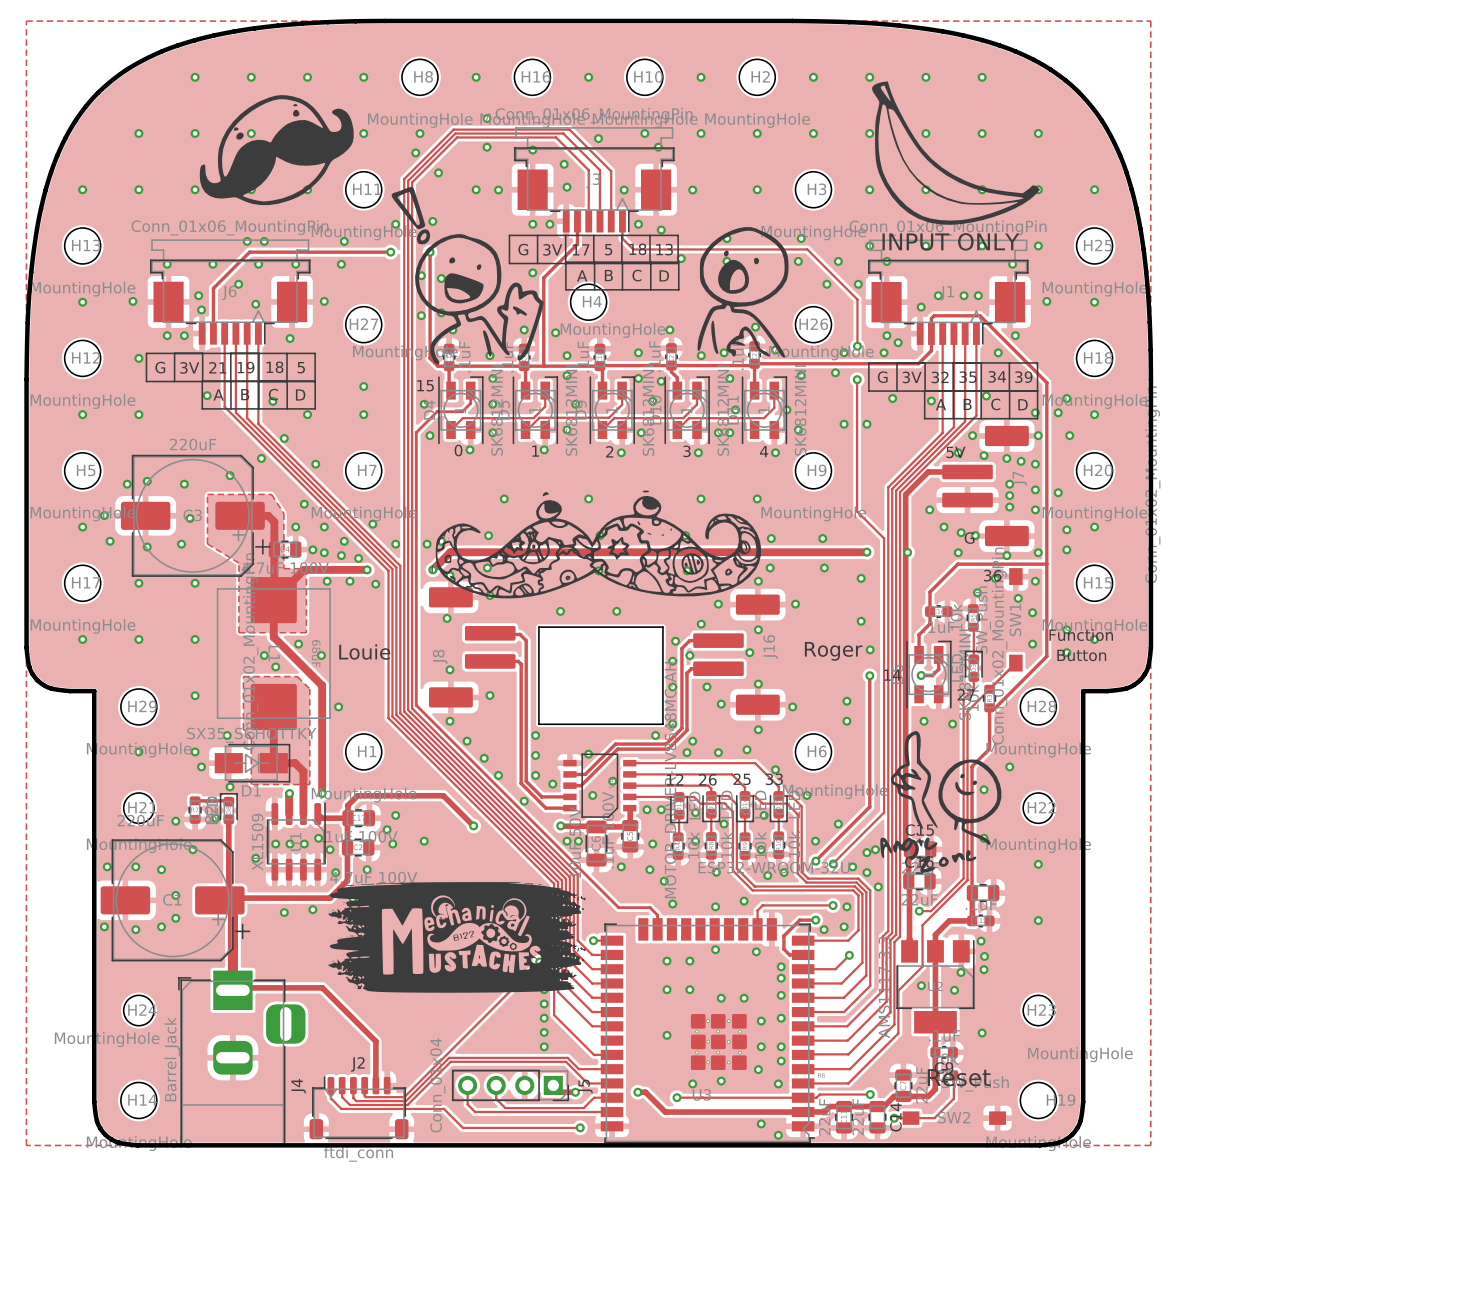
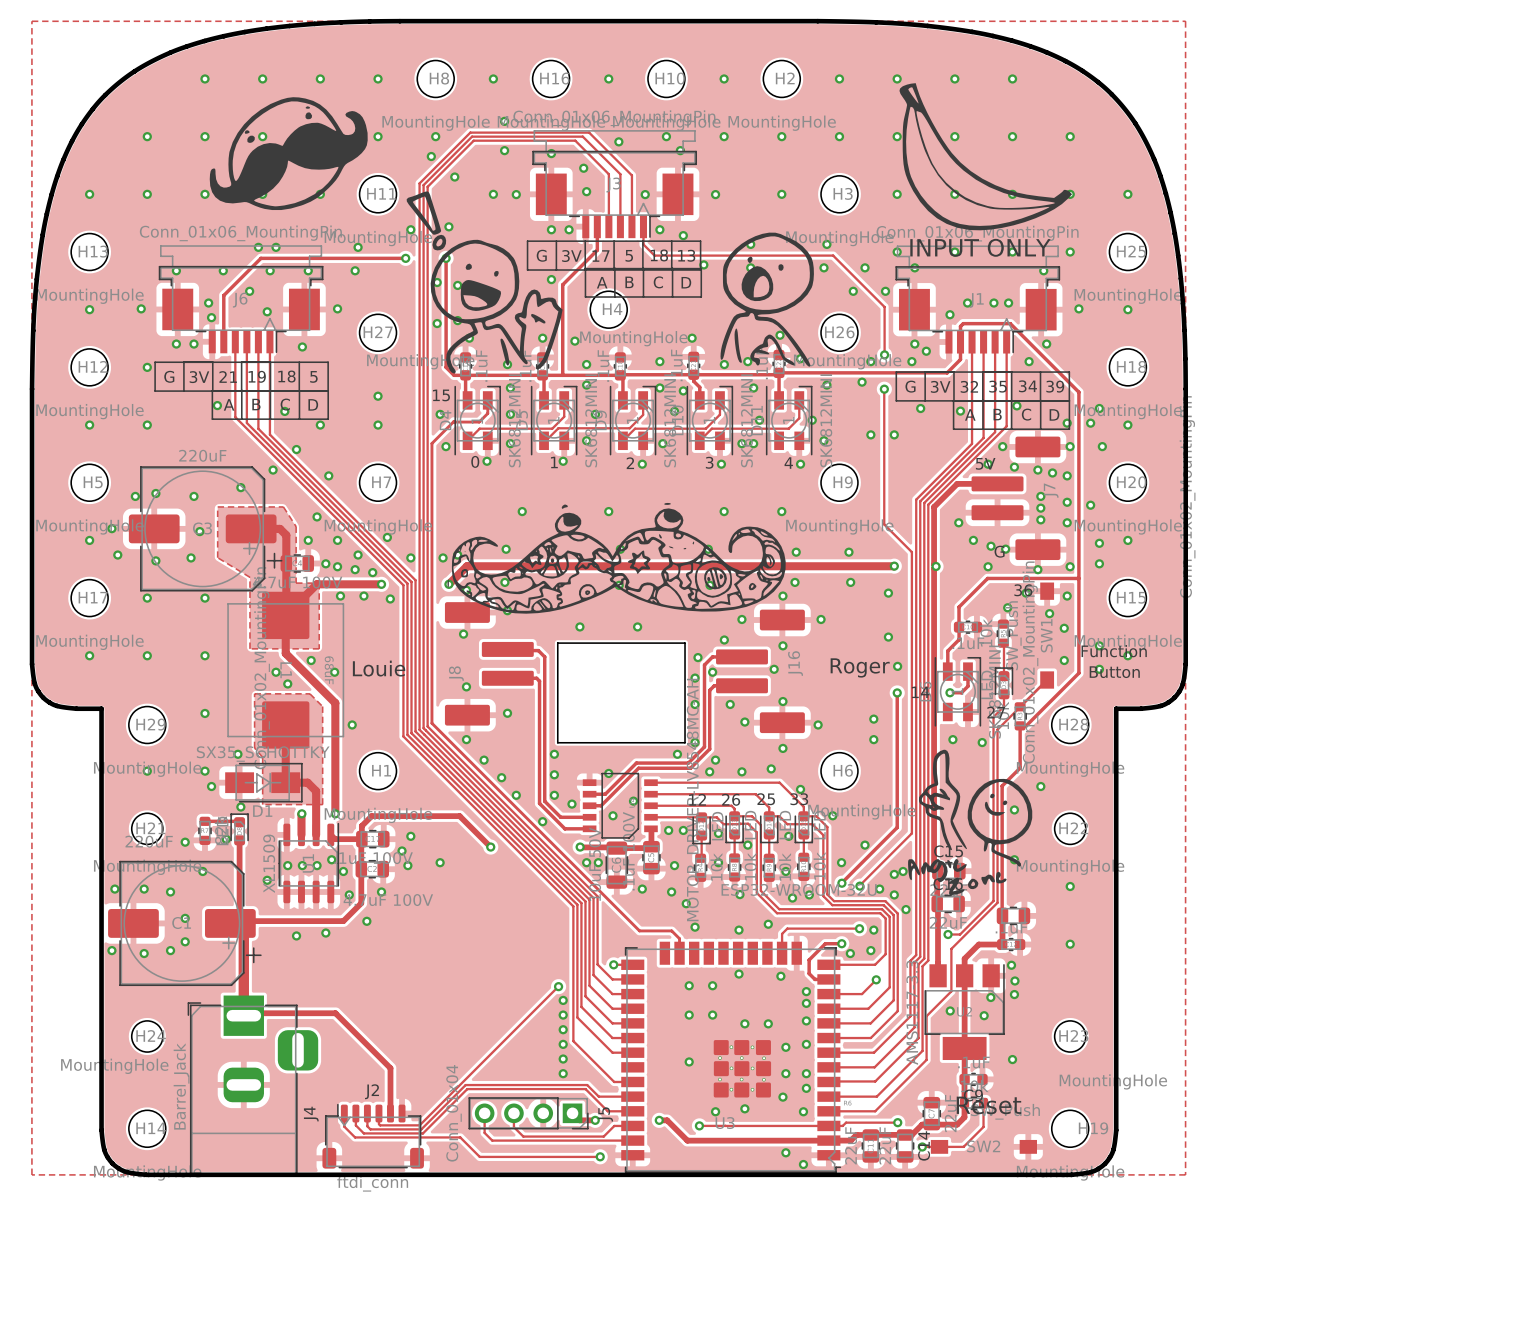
drawing: [328, 882, 586, 993] -> none

